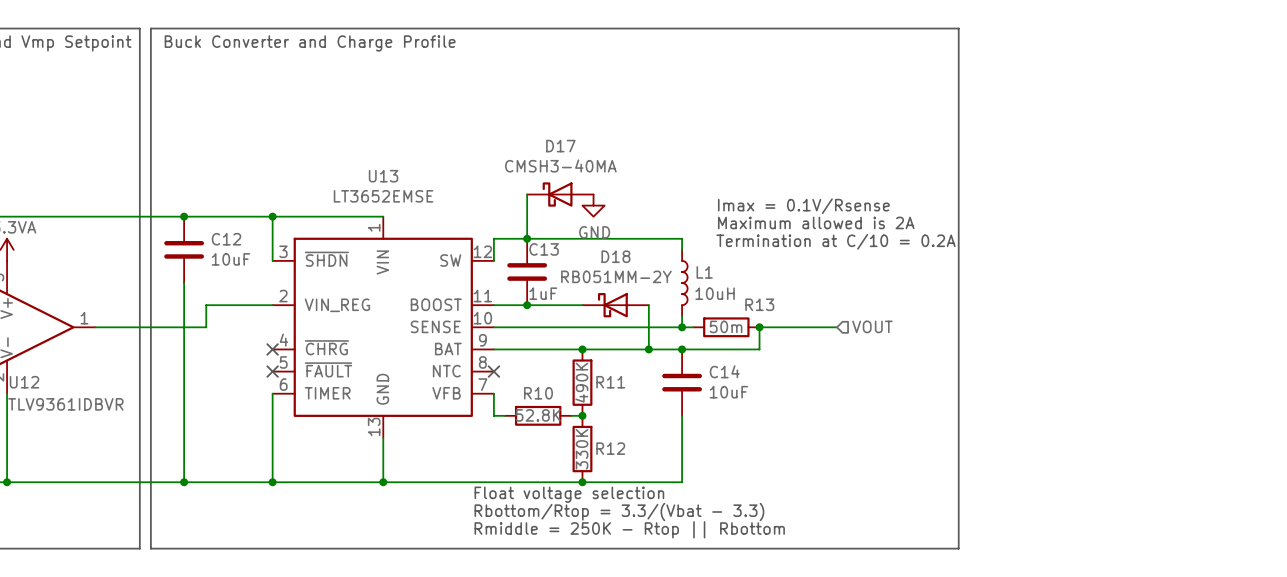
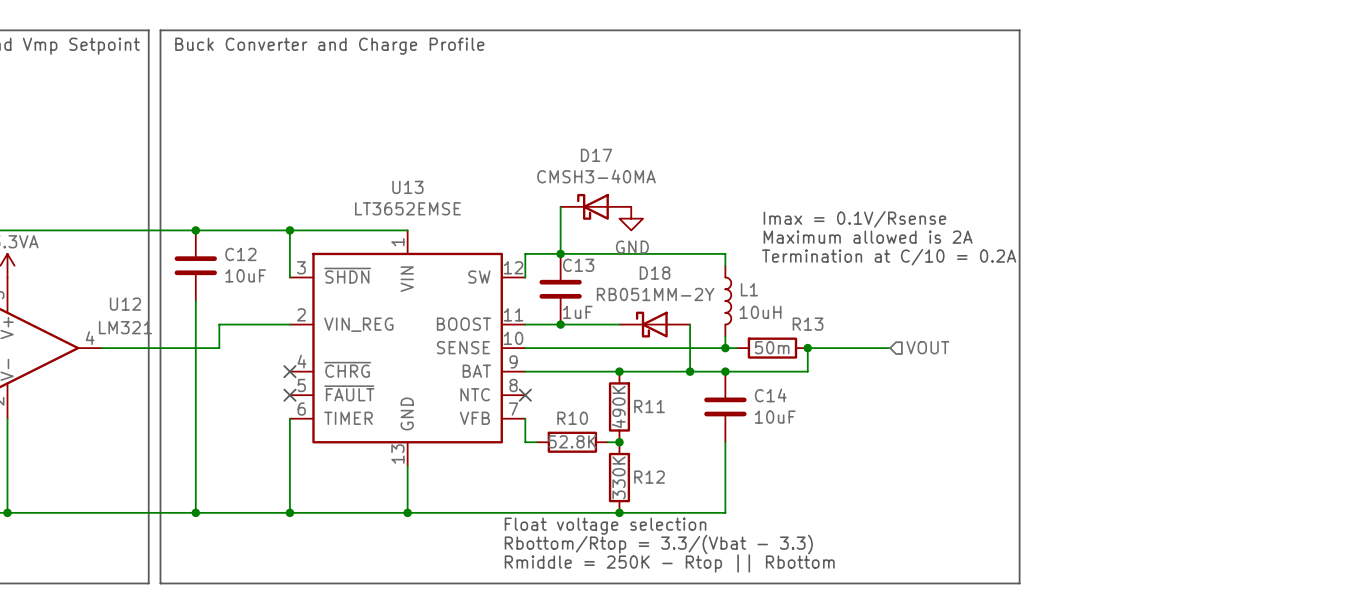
U12 pin number: 1 (84, 318) -> 4 (90, 338)
U12 name position: U12 (24, 382) -> U12 (125, 304)
U12 value: TLV9361IDBVR (65, 404) -> LM321 (125, 327)

